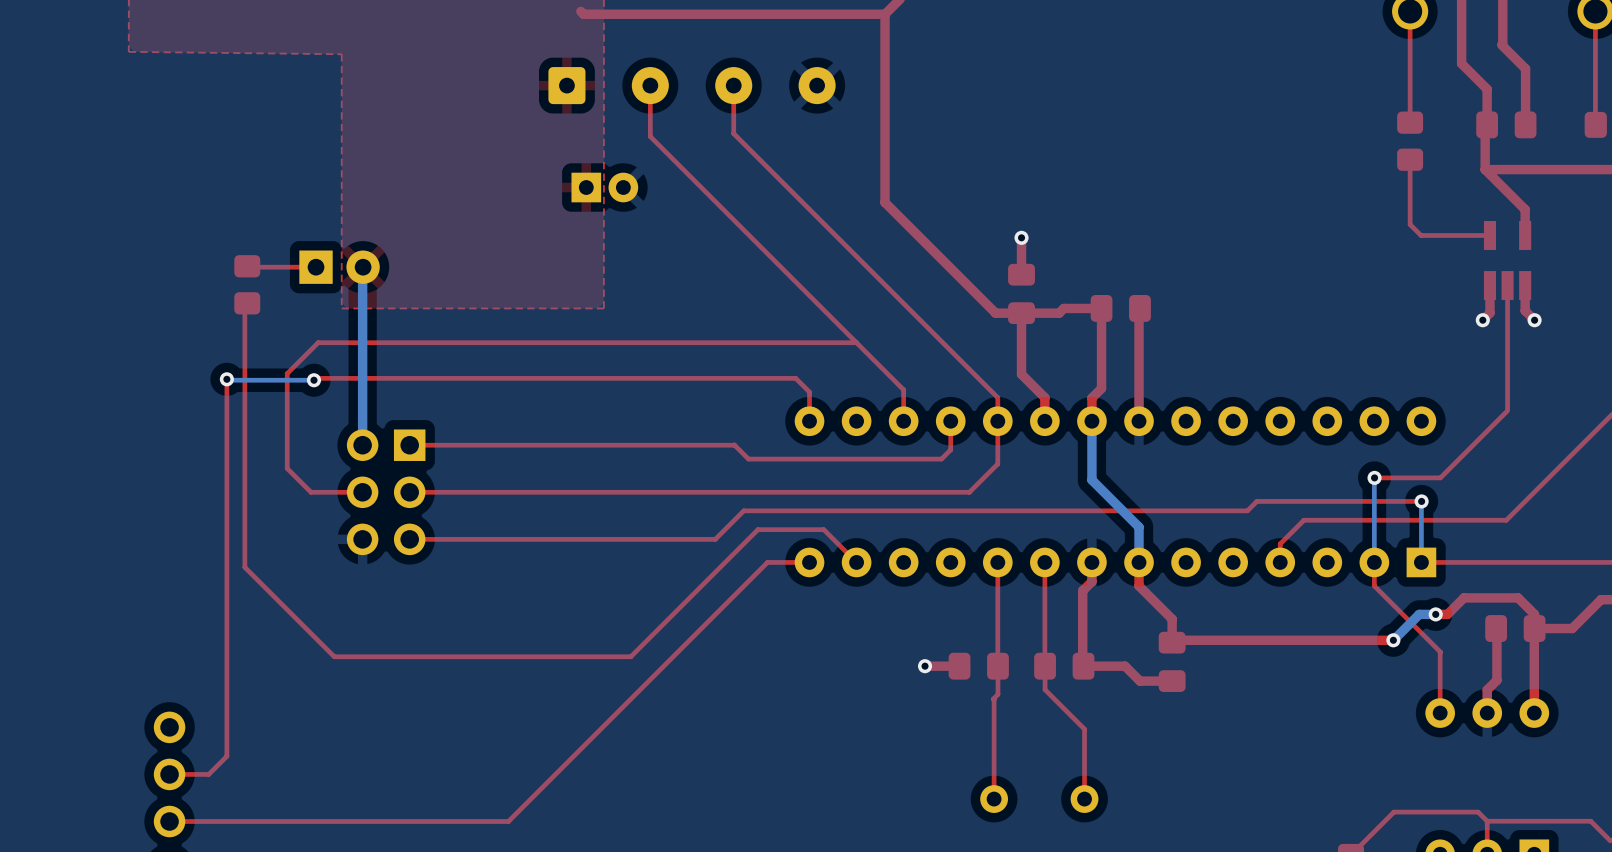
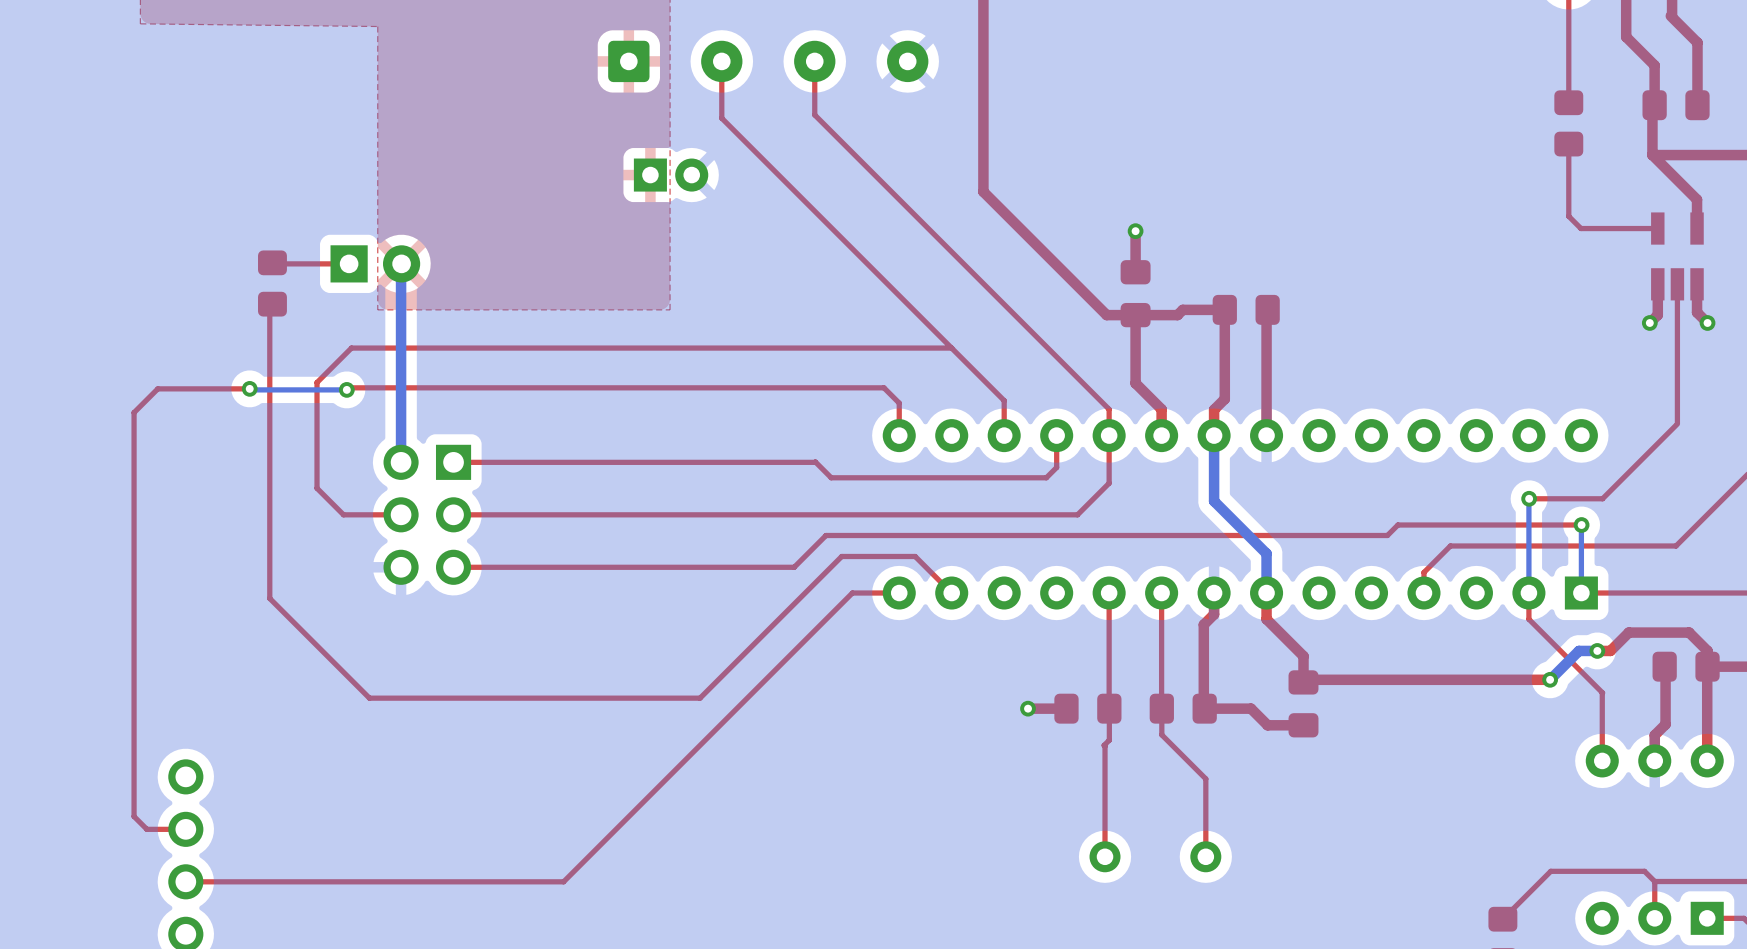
top track: (226, 379) (226, 756) (208, 774) (169, 774) -> (249, 388) (157, 388) (134, 412) (134, 816) (146, 829) (185, 829)

